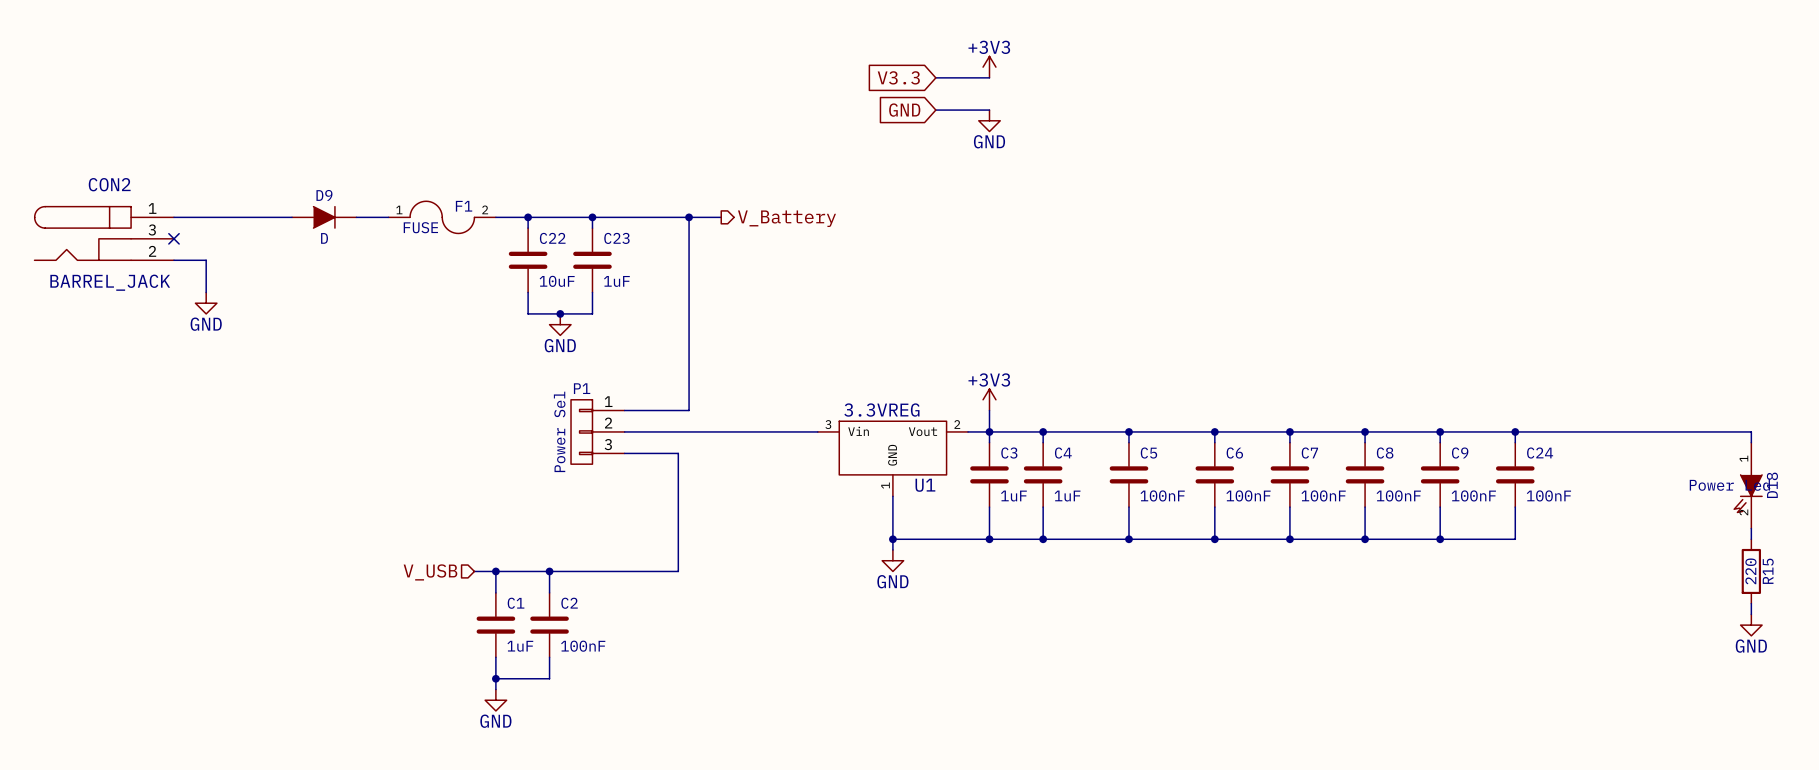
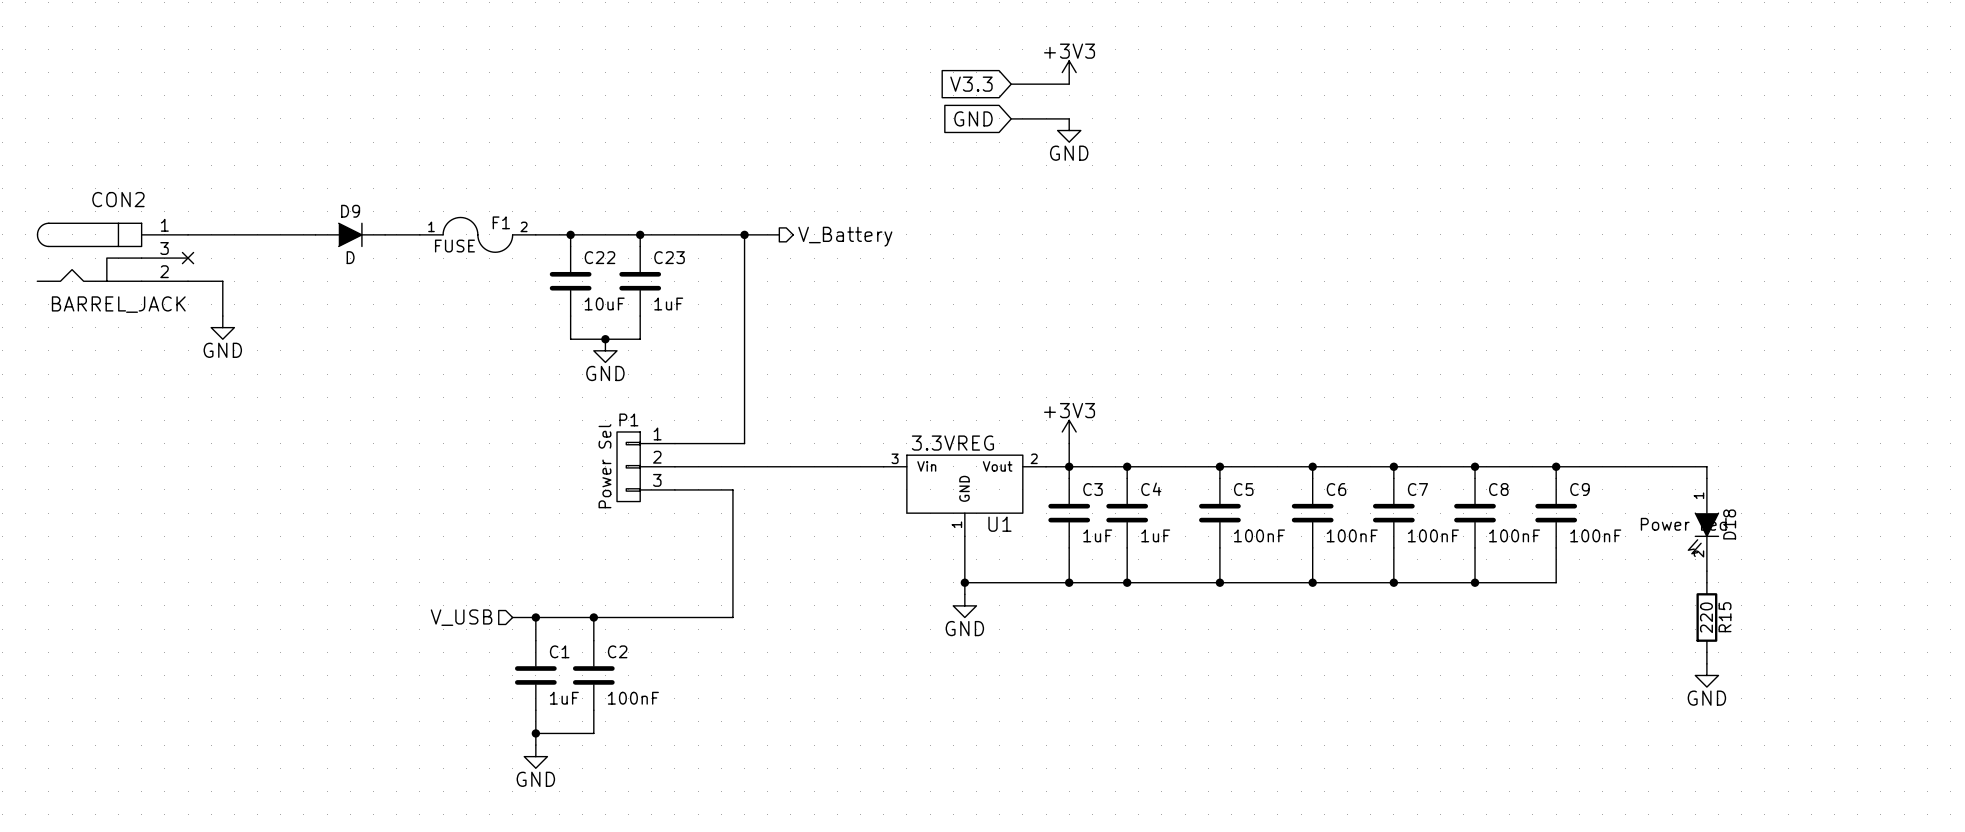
wire: (1515, 431) (1515, 442) -> (1706, 571) (1706, 582)
junction: (1515, 431) -> none
wire: (1579, 431) (1751, 431) (1751, 442) -> (1706, 466) (1706, 478)
C24: 100nF (1515, 474) -> none
D18 position: (1748, 485) -> (1703, 524)
wire: (1515, 507) (1515, 539) (1440, 539) -> none
wire: (1751, 528) (1751, 539) -> none
junction: (1440, 539) -> none
R15 position: (1751, 571) -> (1706, 617)
wire: (1751, 603) (1751, 614) -> (1706, 652) (1706, 663)
power symbol position: GND (1751, 625) -> GND (1706, 675)

